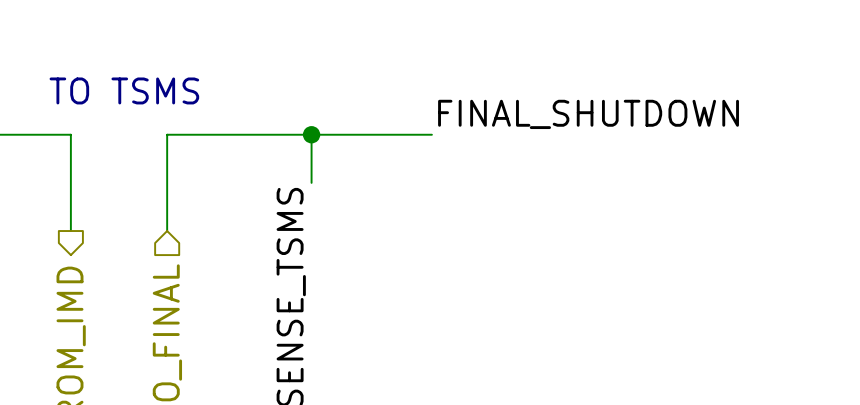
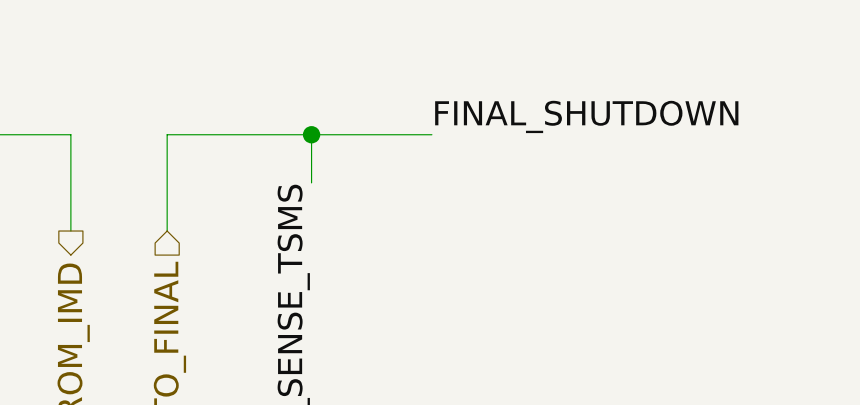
text: TO TSMS (124, 90) -> none

